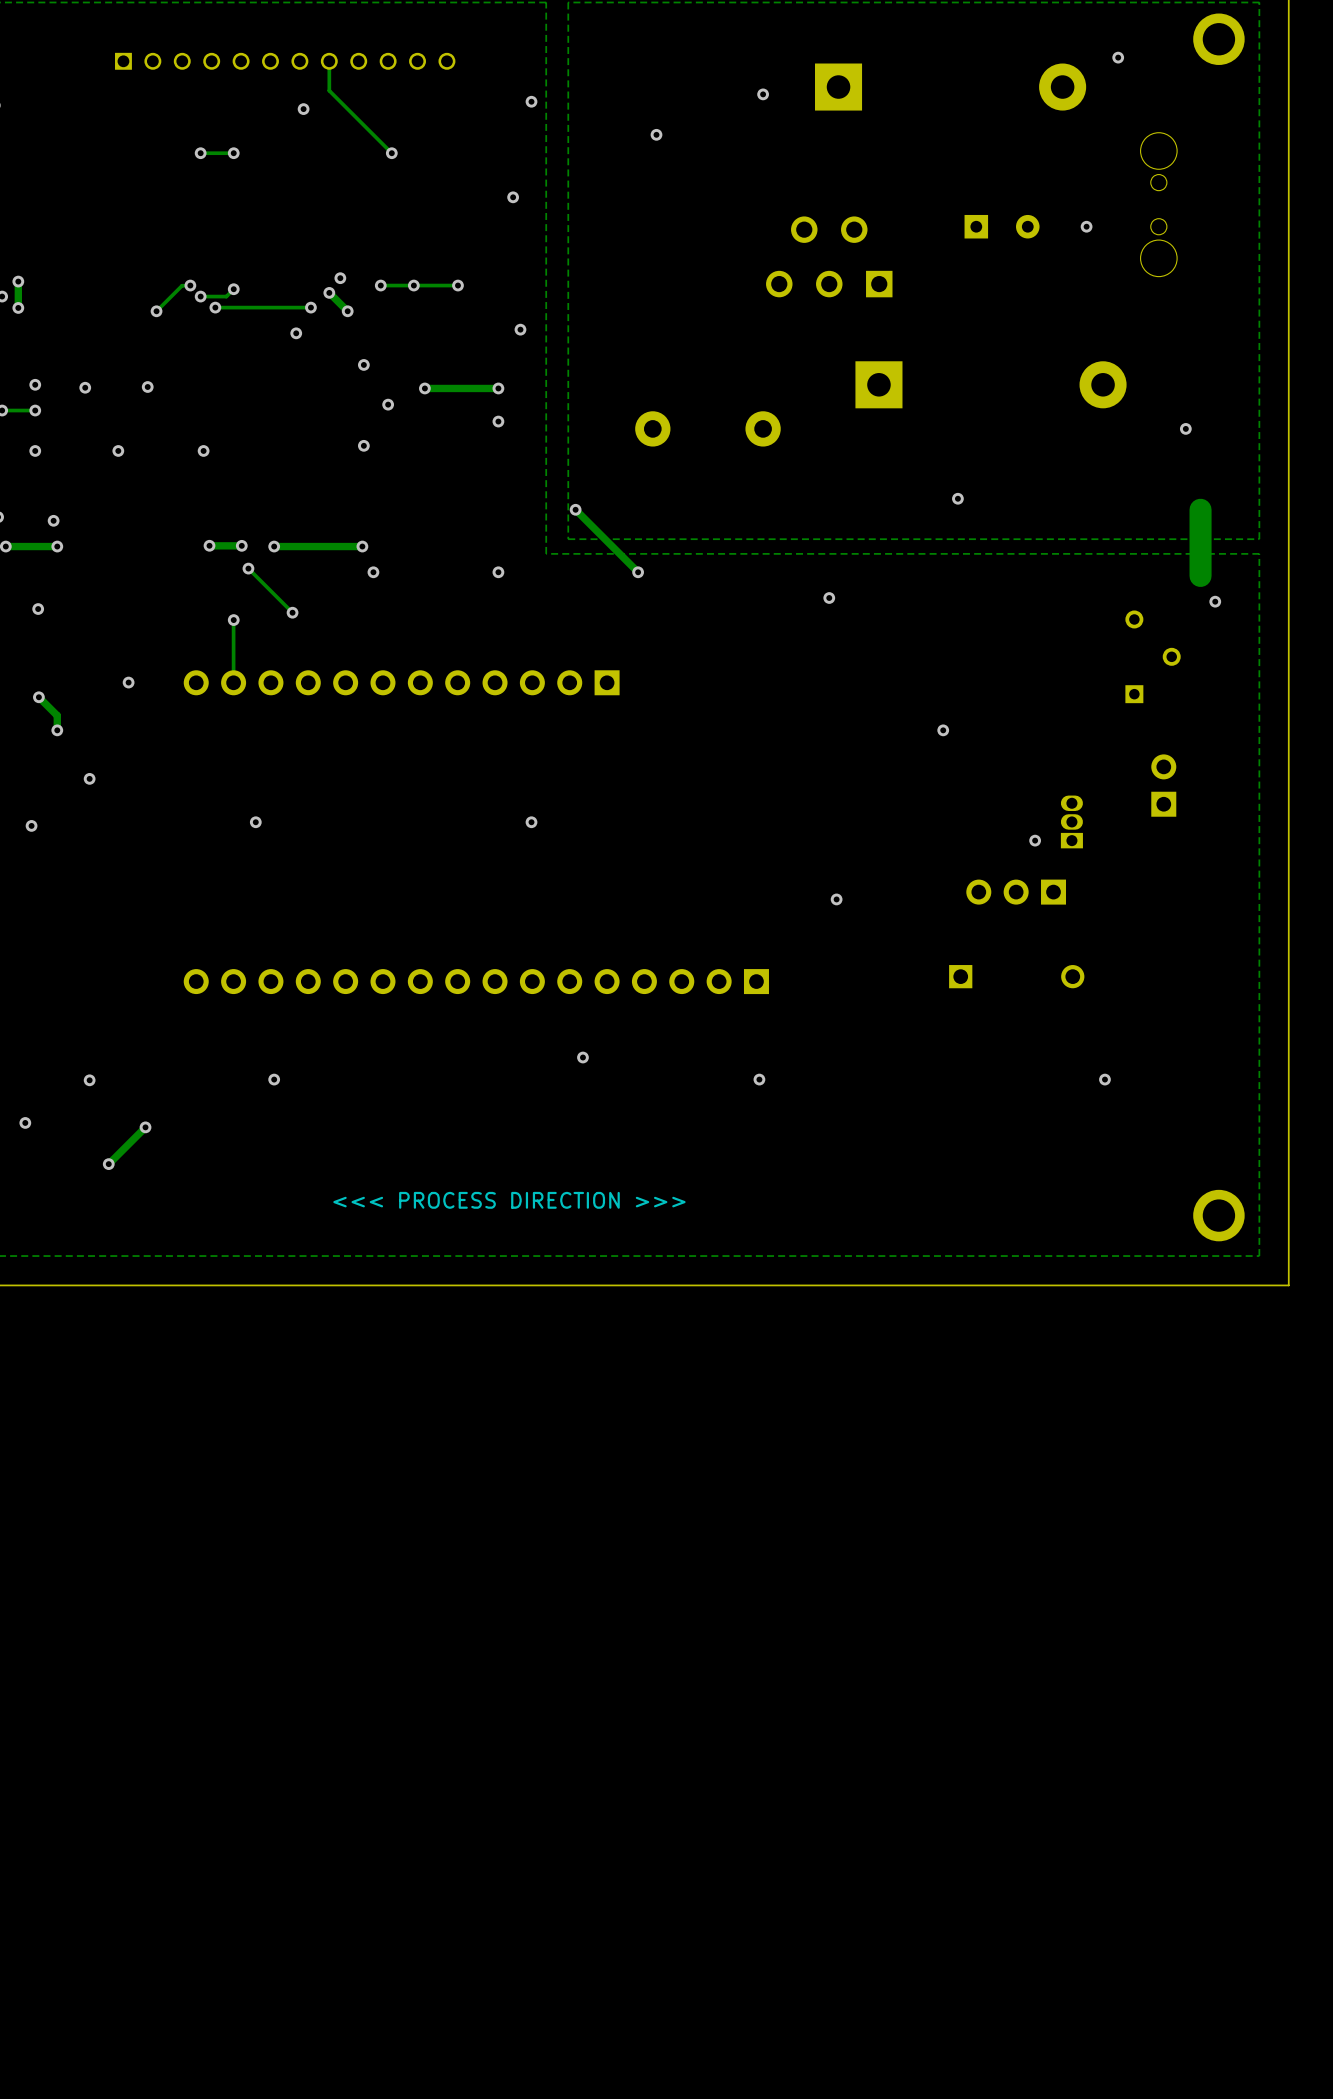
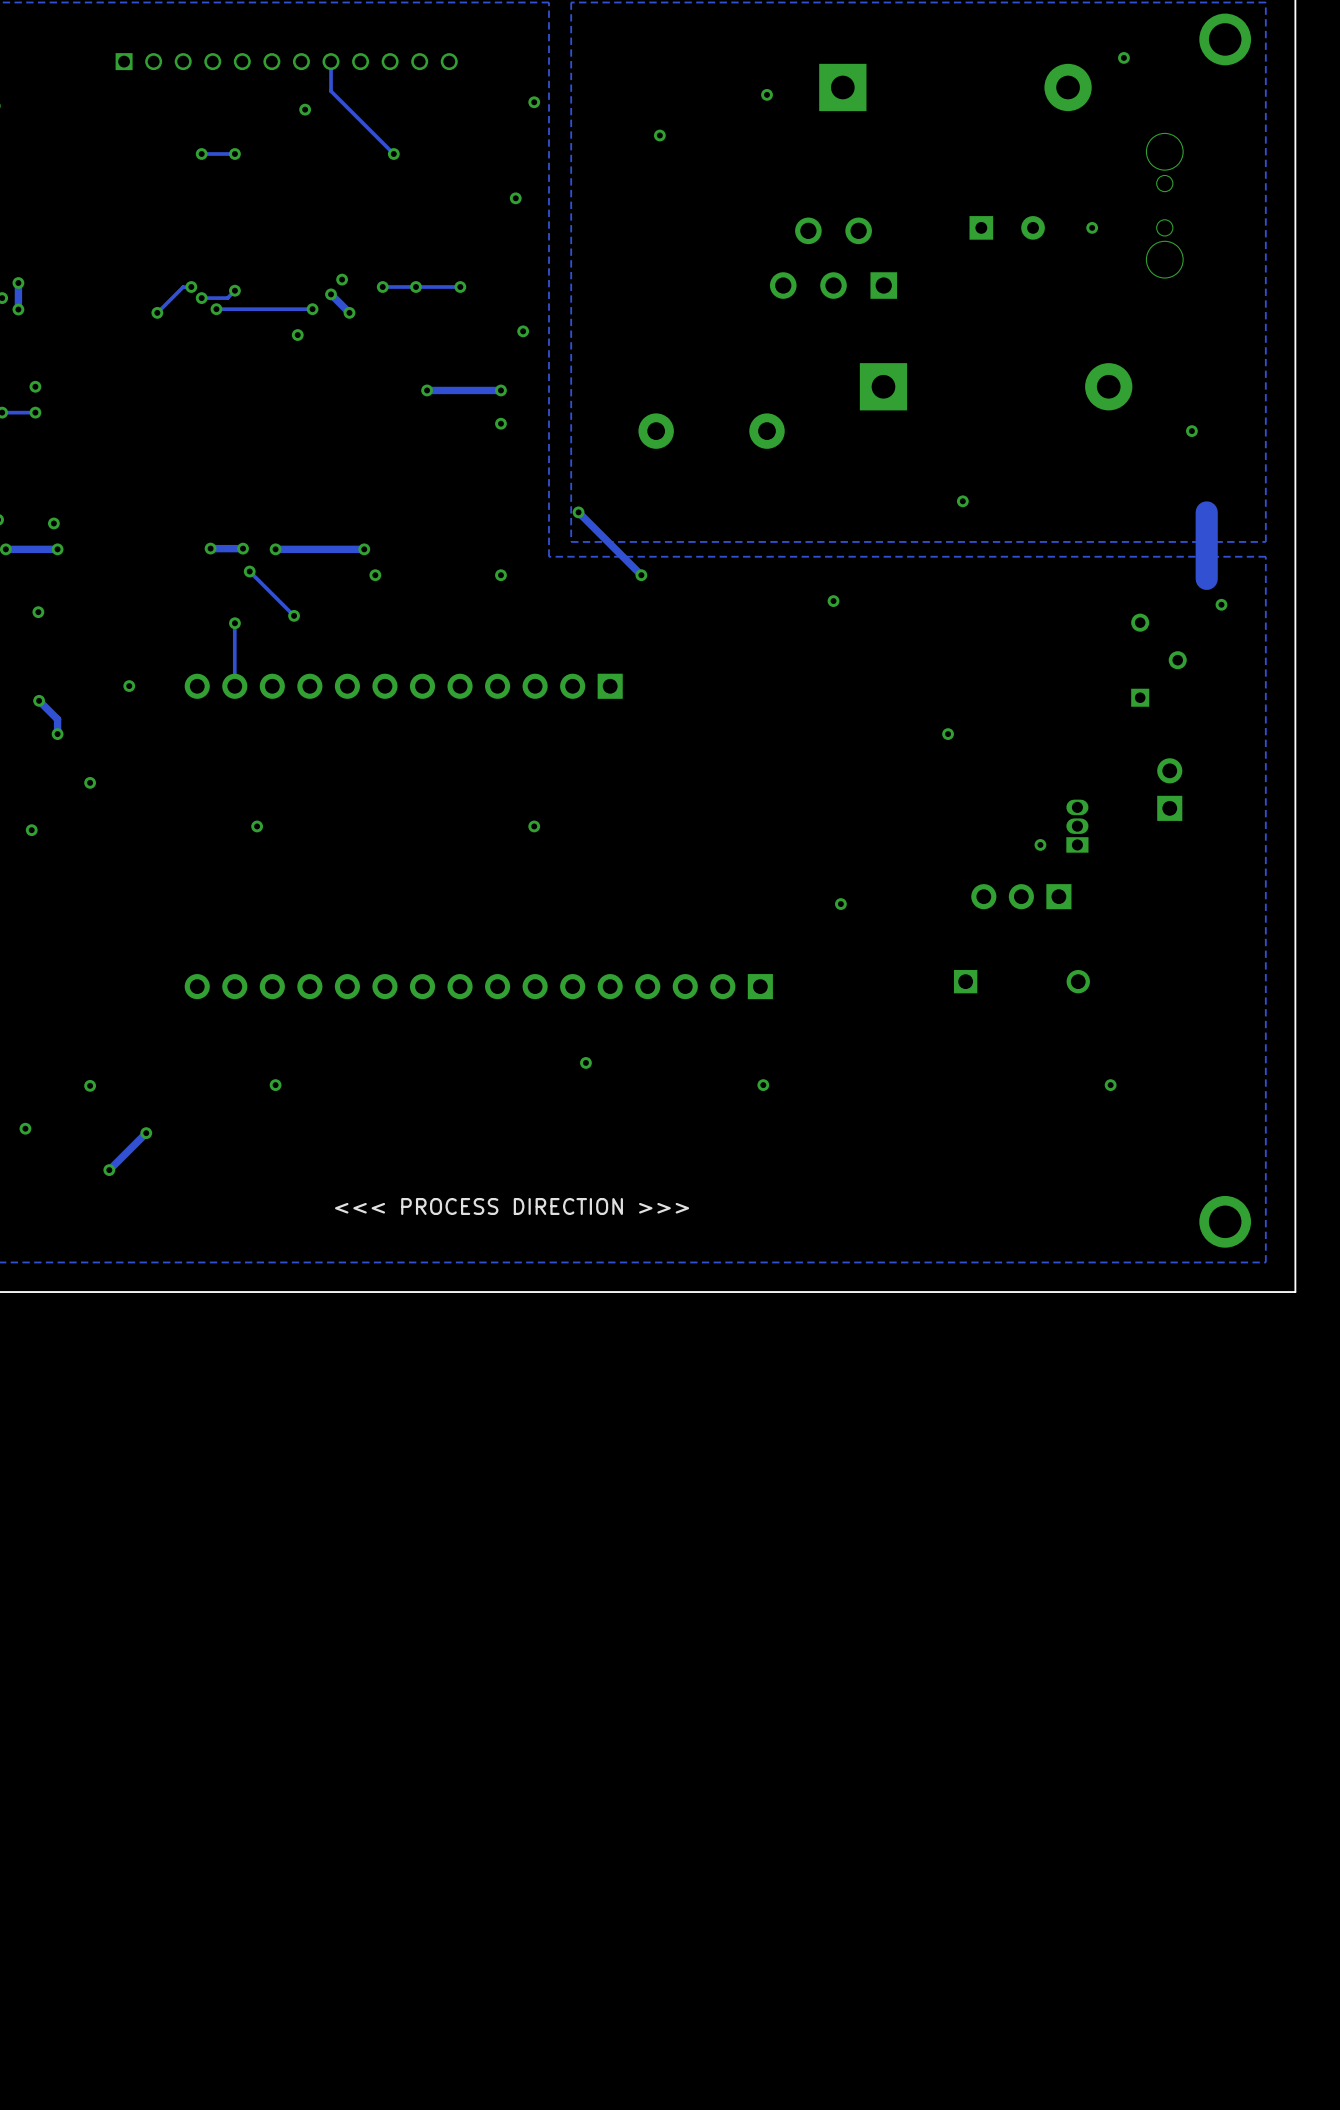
via: (363, 364) -> none
via: (85, 387) -> none
via: (147, 387) -> none
via: (388, 404) -> none
via: (363, 445) -> none
via: (35, 450) -> none
via: (118, 450) -> none
via: (203, 450) -> none

